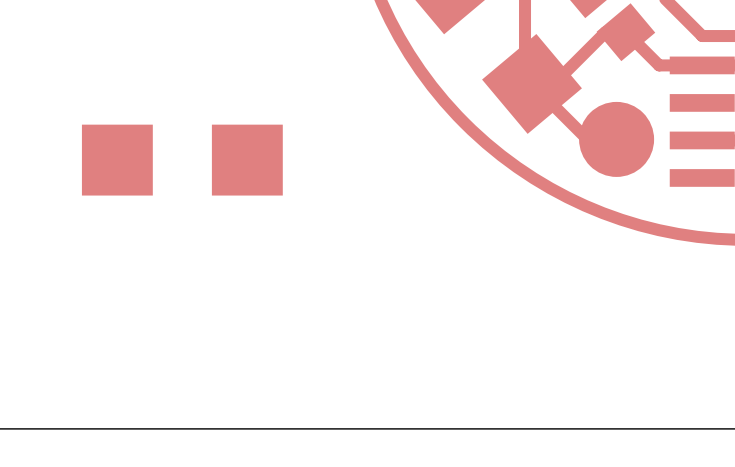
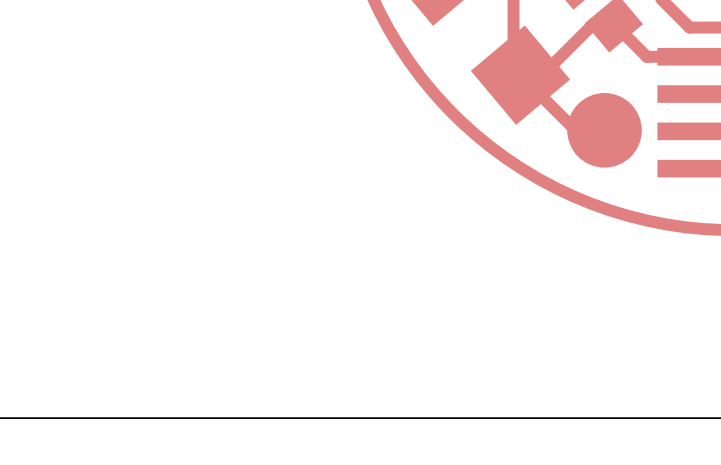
part: (182, 160) -> none

